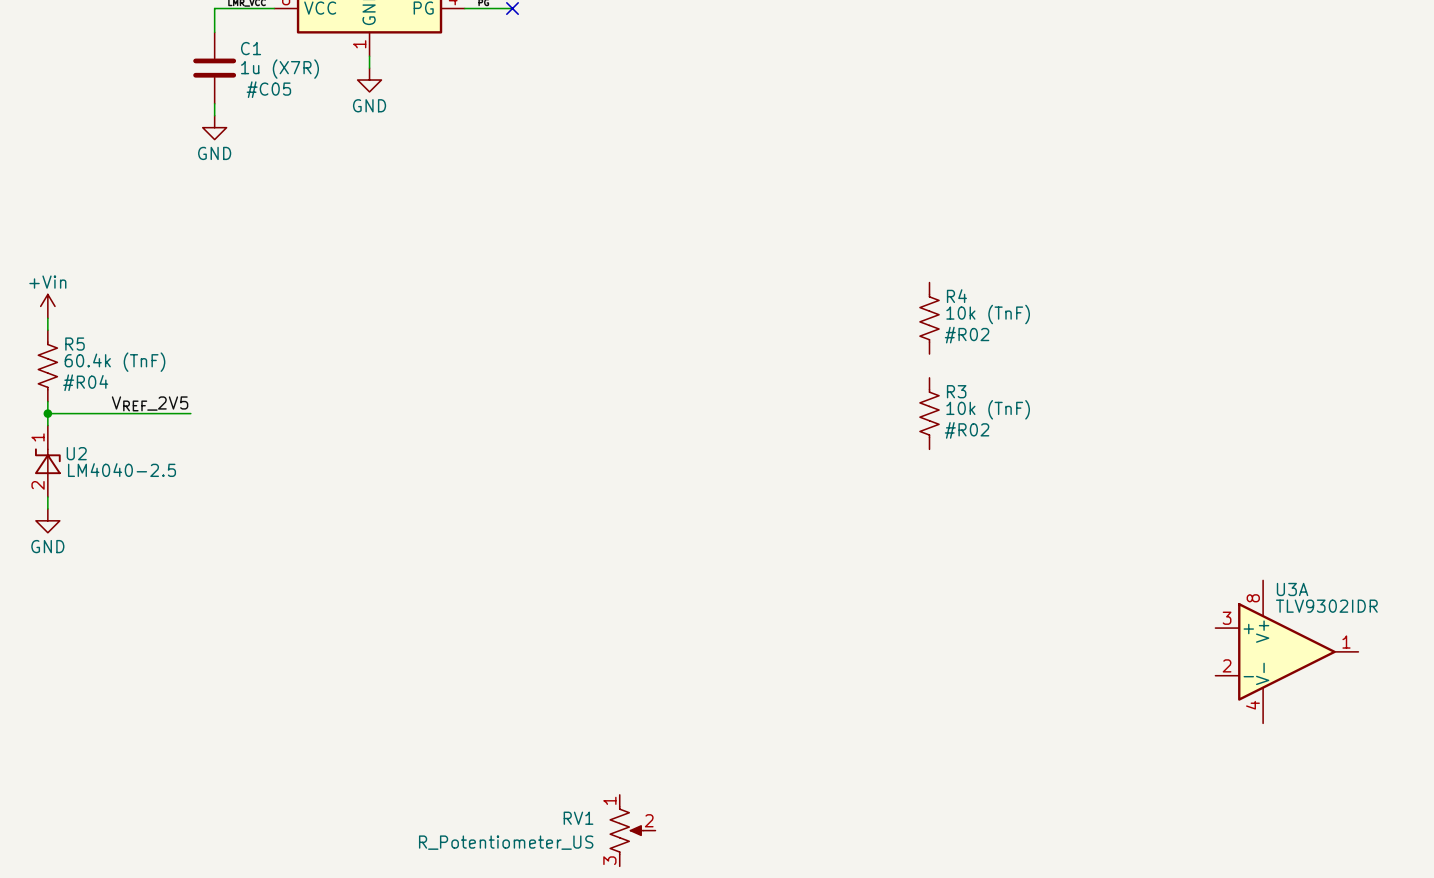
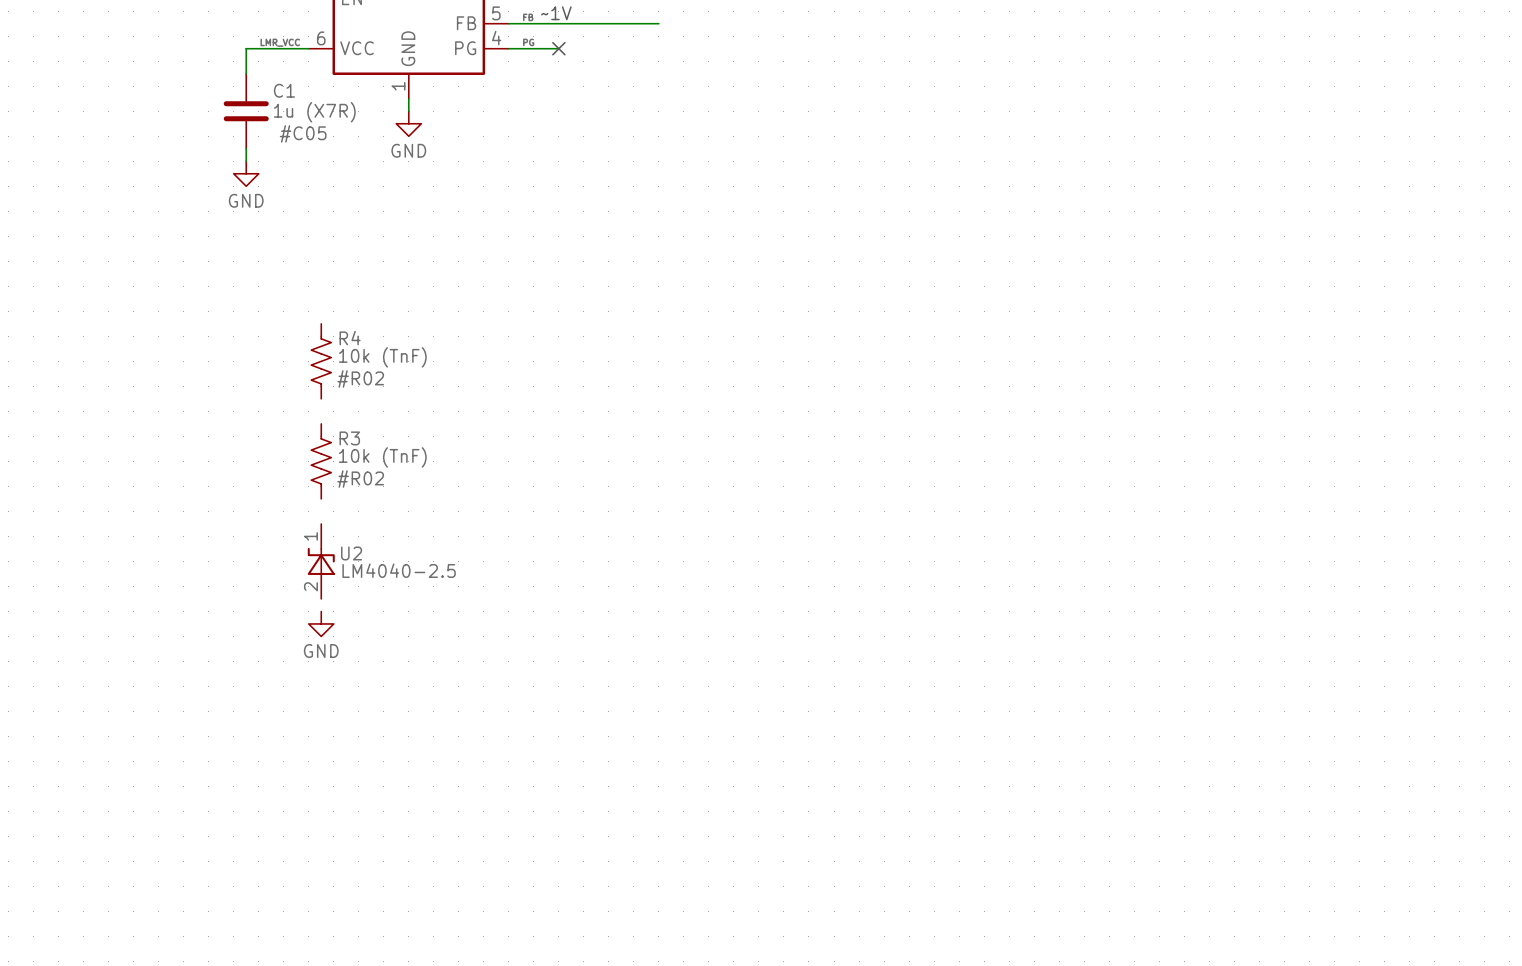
power symbol: +Vin (47, 306) -> none
wire: (47, 318) (47, 330) -> none
R4 position: (929, 318) -> (321, 361)
R5: 60.4k (TnF) (47, 365) -> none
wire: (47, 401) (47, 425) -> none
label: VREF_2V5 (150, 403) -> none
wire: (47, 413) (190, 413) -> none
junction: (47, 413) -> none
R3 position: (929, 413) -> (321, 461)
U2 position: (47, 461) -> (321, 561)
wire: (47, 497) (47, 508) -> none
power symbol: GND (47, 520) -> none
power symbol: none -> GND (321, 623)
part: (1263, 651) -> none
U3A: TLV9302IDR (1286, 651) -> none
RV1: R_Potentiometer_US (632, 830) -> none

